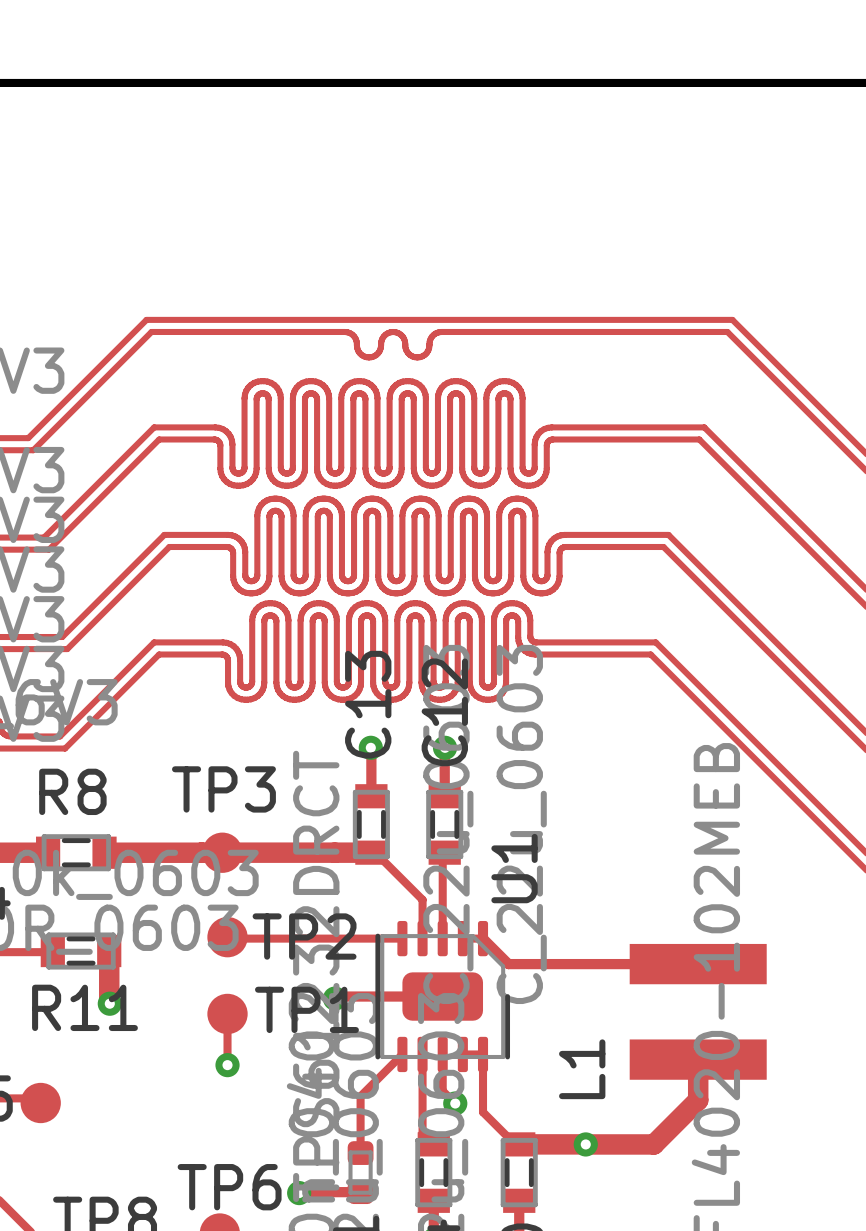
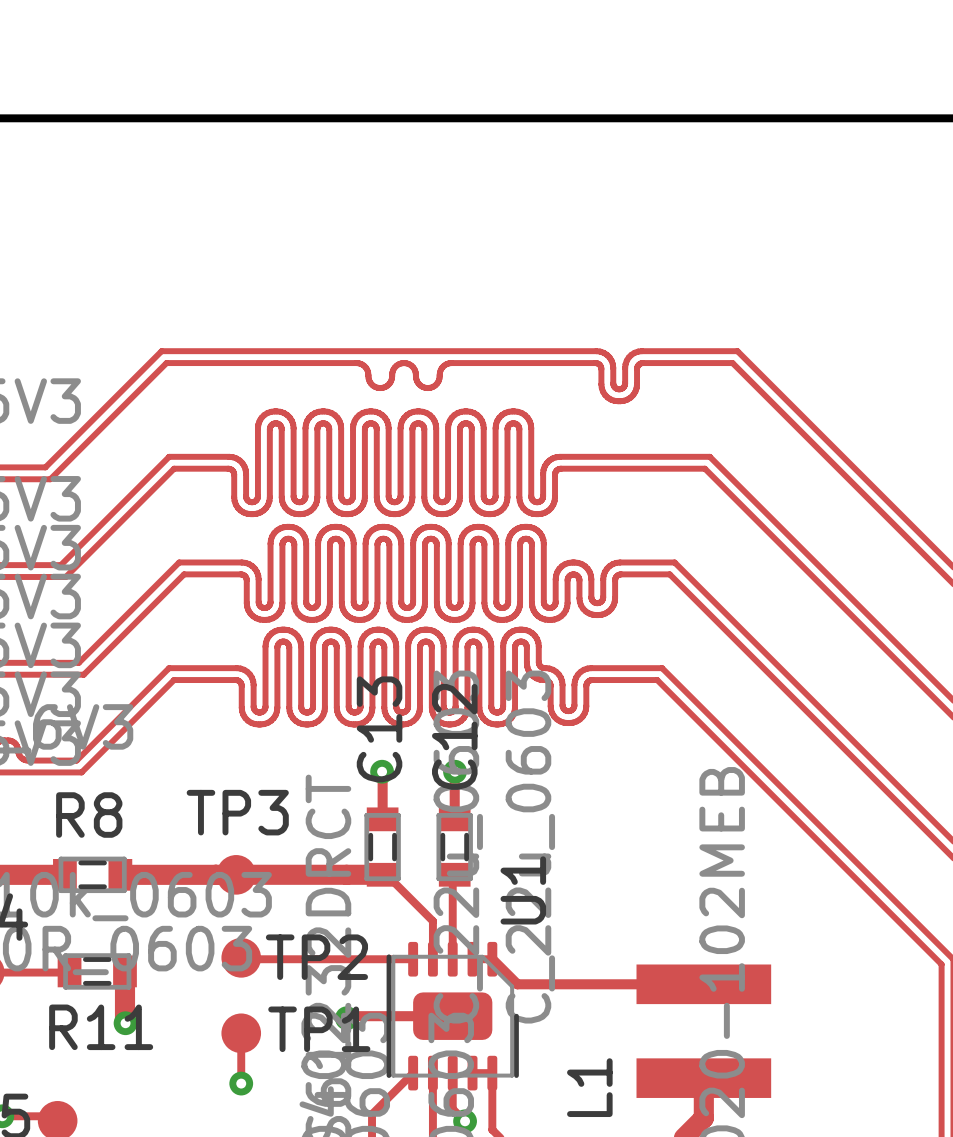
track: (588, 319) (635, 319) -> (596, 351) (603, 352) (611, 360) (613, 384) (619, 389) (624, 384) (626, 360) (634, 352) (641, 351)
track: (587, 331) (636, 331) -> (595, 363) (601, 367) (603, 391) (610, 399) (618, 401) (627, 399) (633, 394) (636, 388) (637, 367) (642, 363)
track: (566, 534) (612, 534) -> (574, 562) (581, 564) (589, 571) (591, 598) (597, 603) (603, 598) (604, 571) (612, 564) (620, 562)
track: (565, 546) (613, 546) -> (573, 574) (579, 578) (581, 605) (588, 613) (596, 615) (605, 613) (613, 605) (615, 578) (621, 574)
track: (537, 642) (583, 642) -> (545, 668) (553, 669) (560, 677) (562, 706) (568, 711) (574, 706) (576, 677) (583, 669) (591, 668)
track: (536, 654) (584, 654) -> (544, 680) (550, 684) (552, 713) (560, 721) (567, 723) (576, 721) (584, 713) (586, 684) (592, 680)

